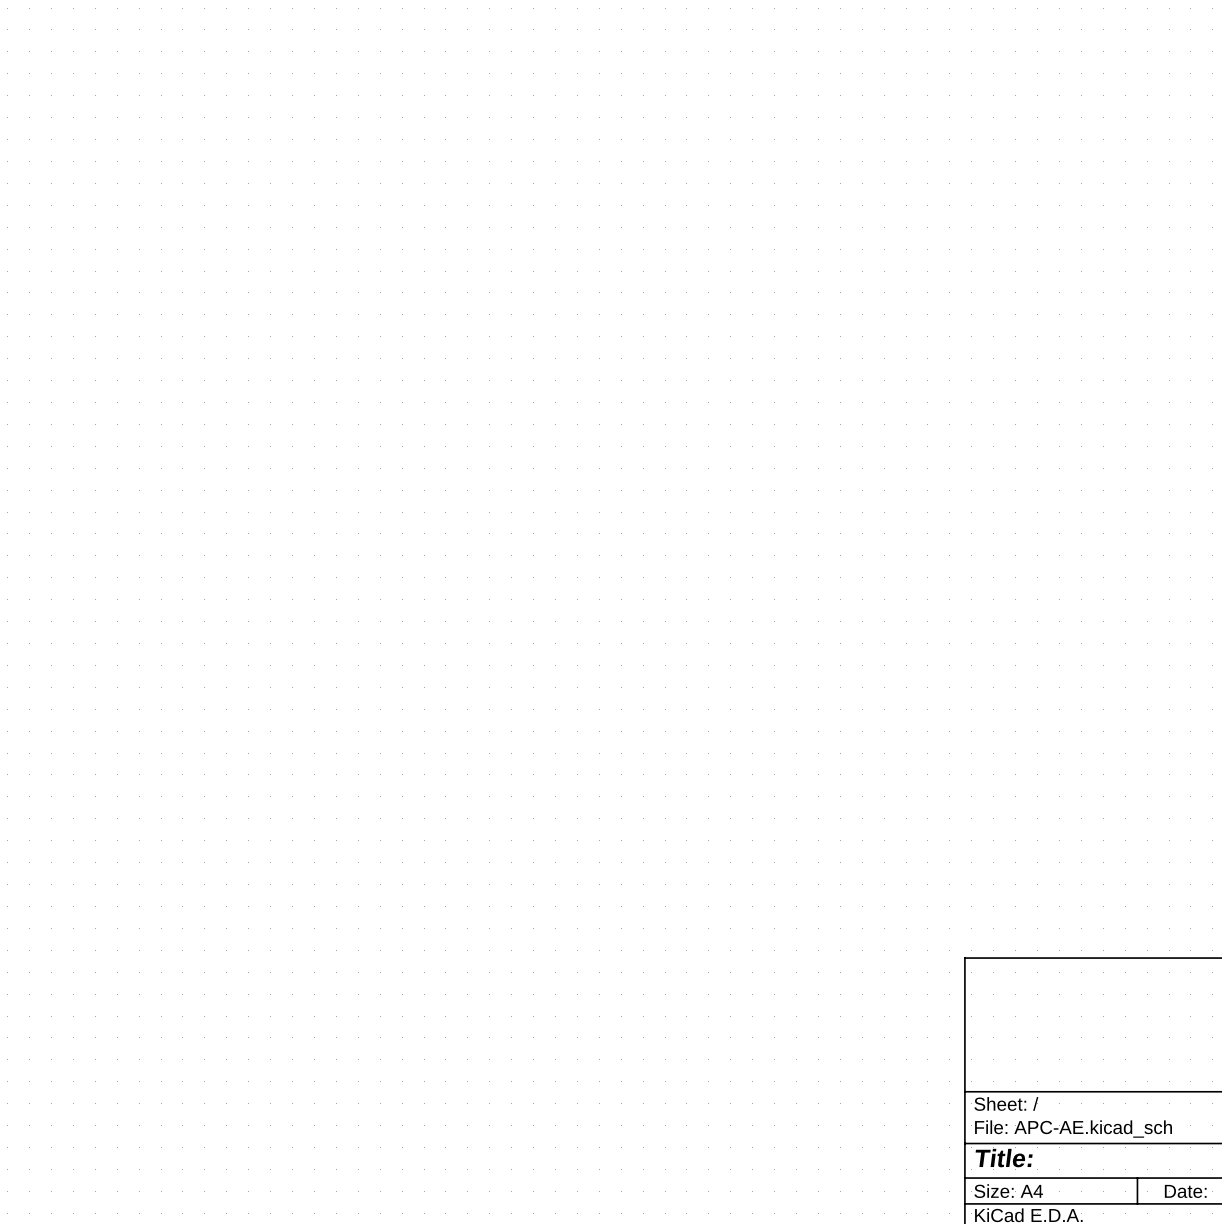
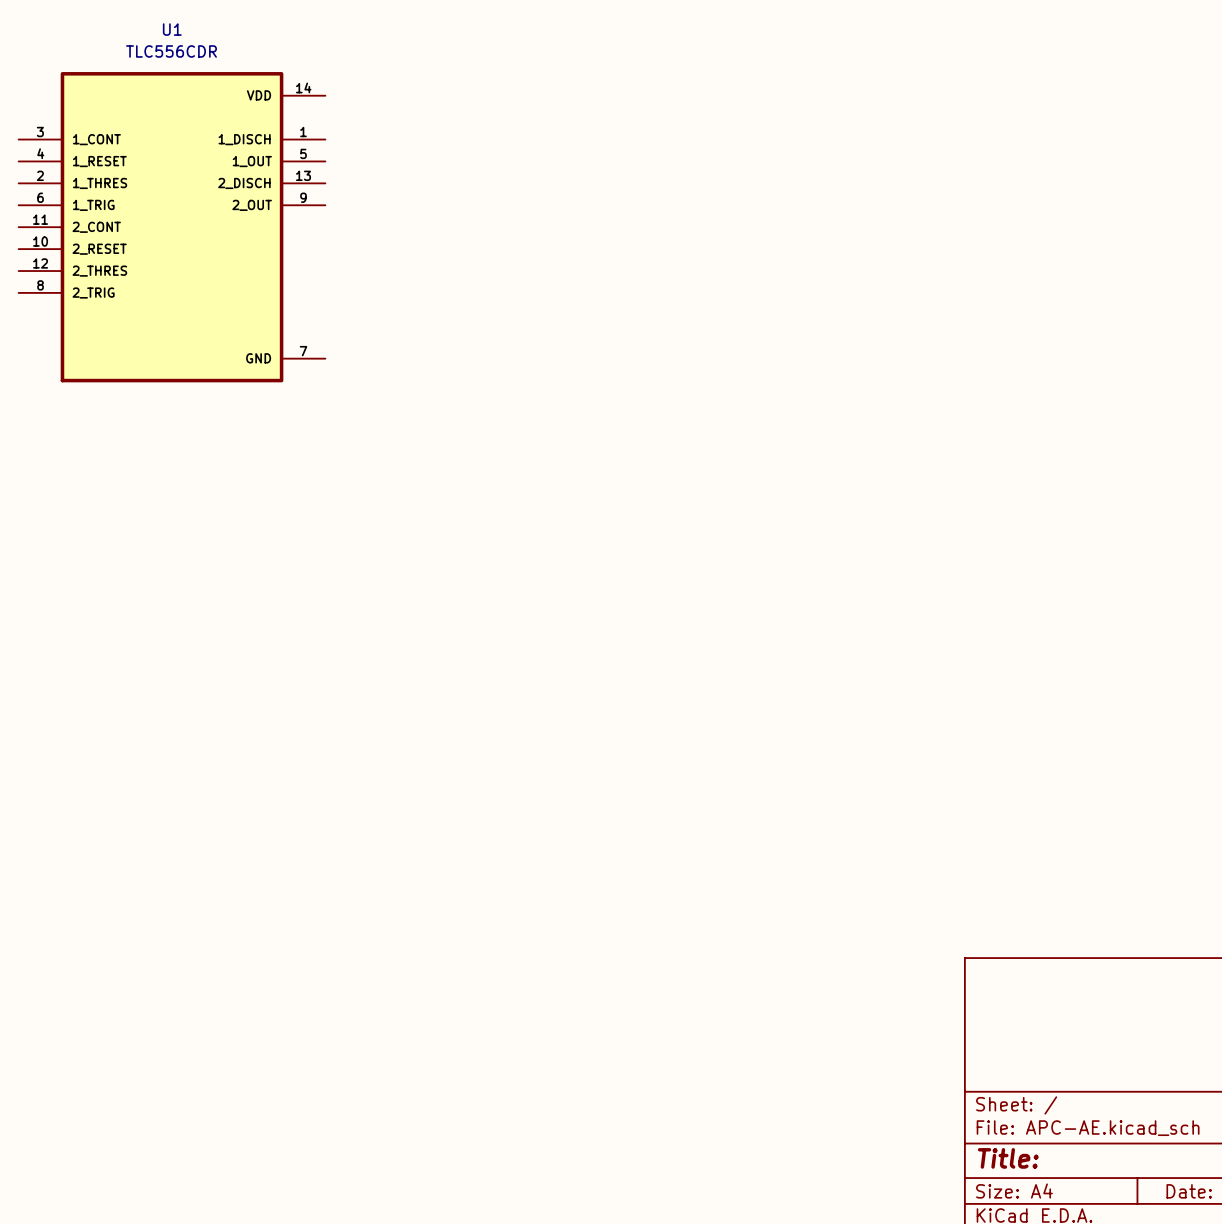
U1: none -> TLC556CDR (172, 227)

